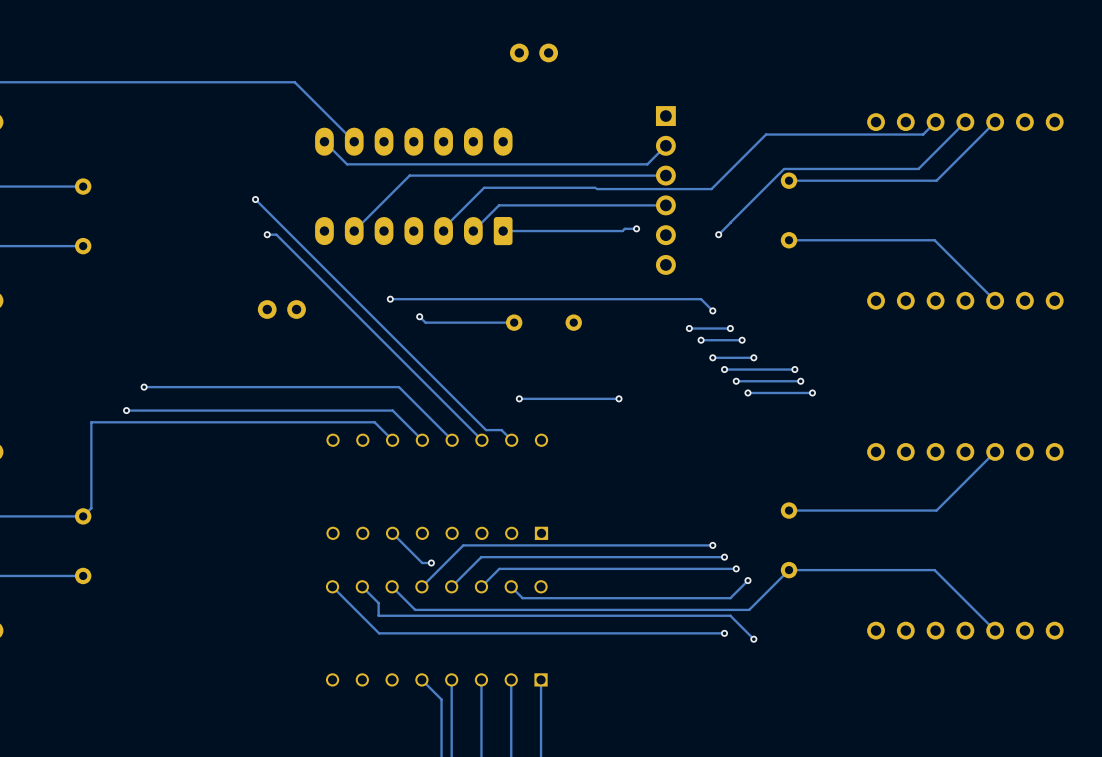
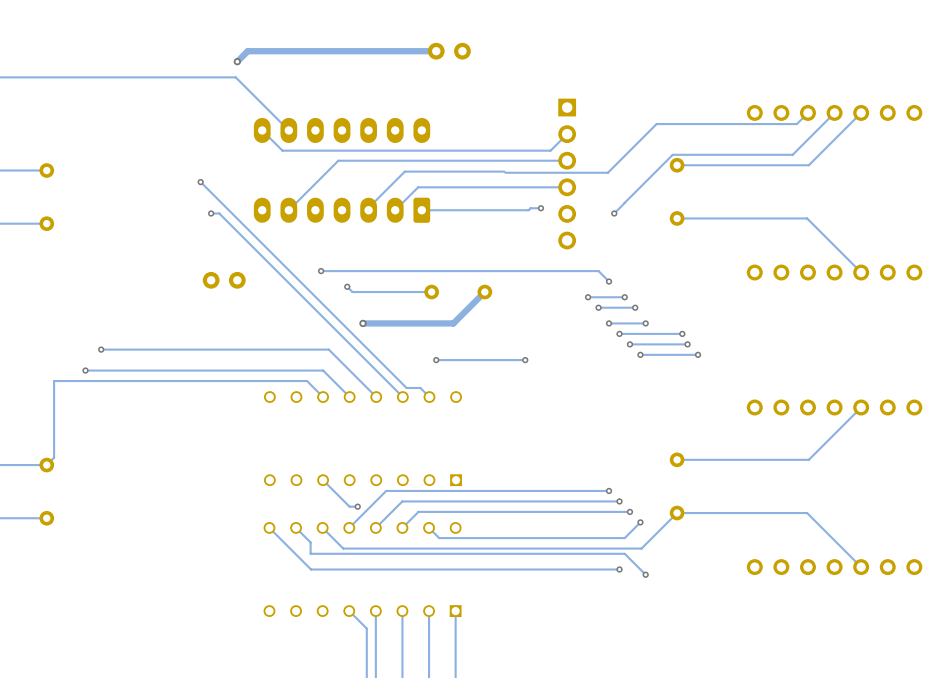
track: none -> (436, 51) (247, 51) (237, 61)
via: none -> (237, 61)
track: none -> (484, 292) (453, 323) (362, 323)
via: none -> (362, 323)

